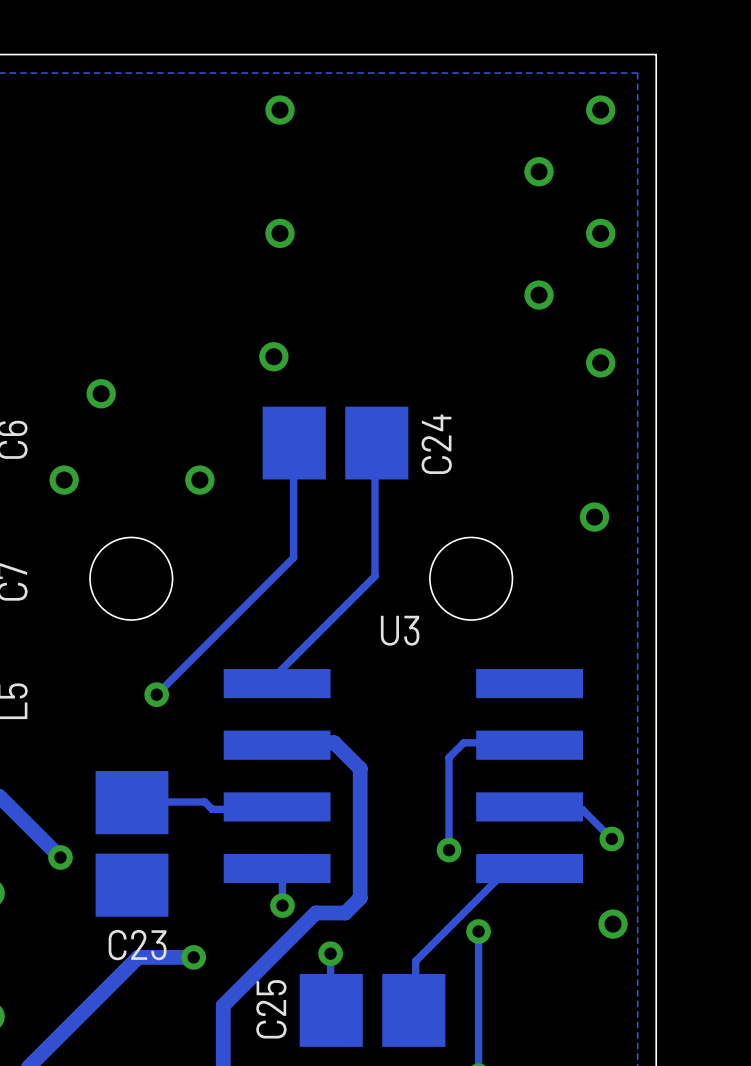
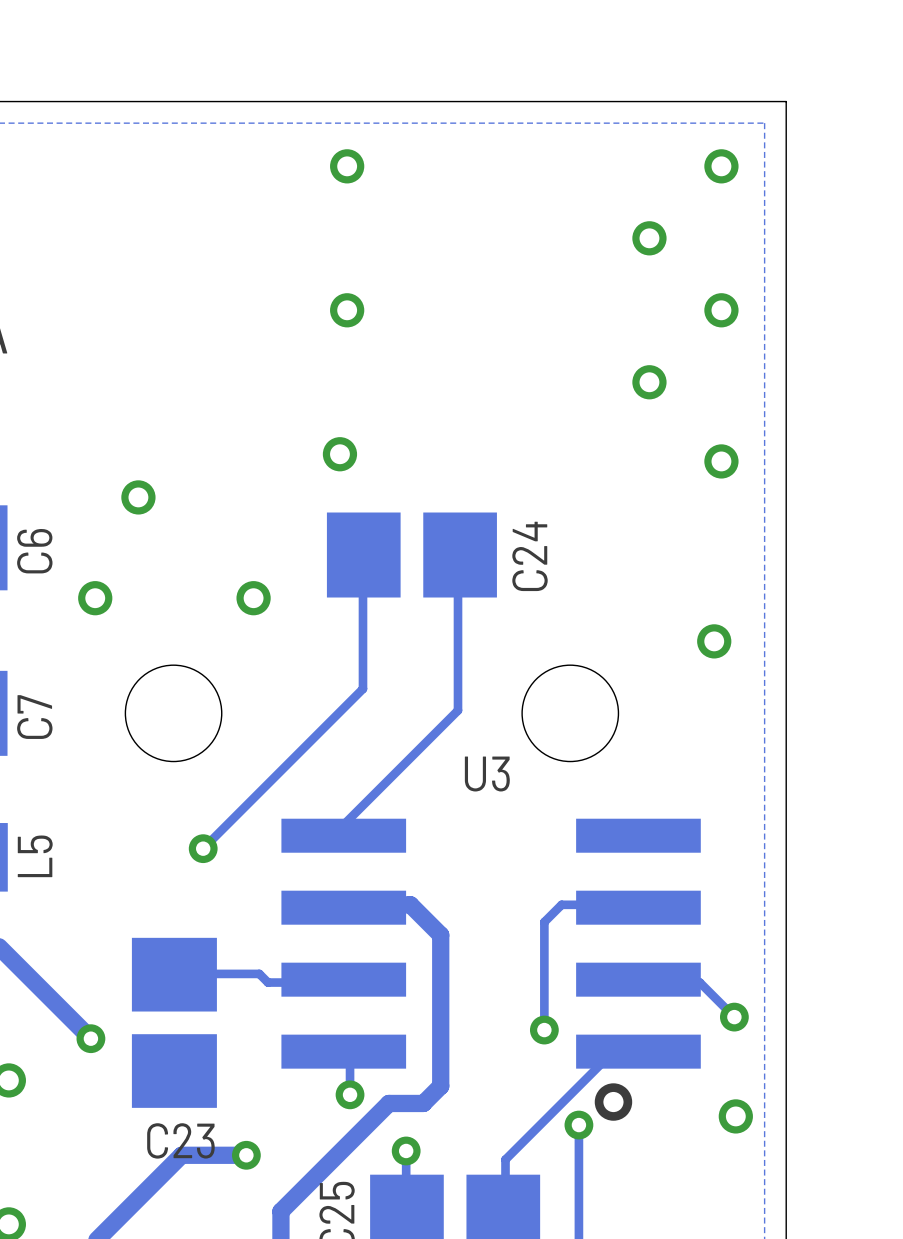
drawing: none -> [594, 1083, 633, 1121]

